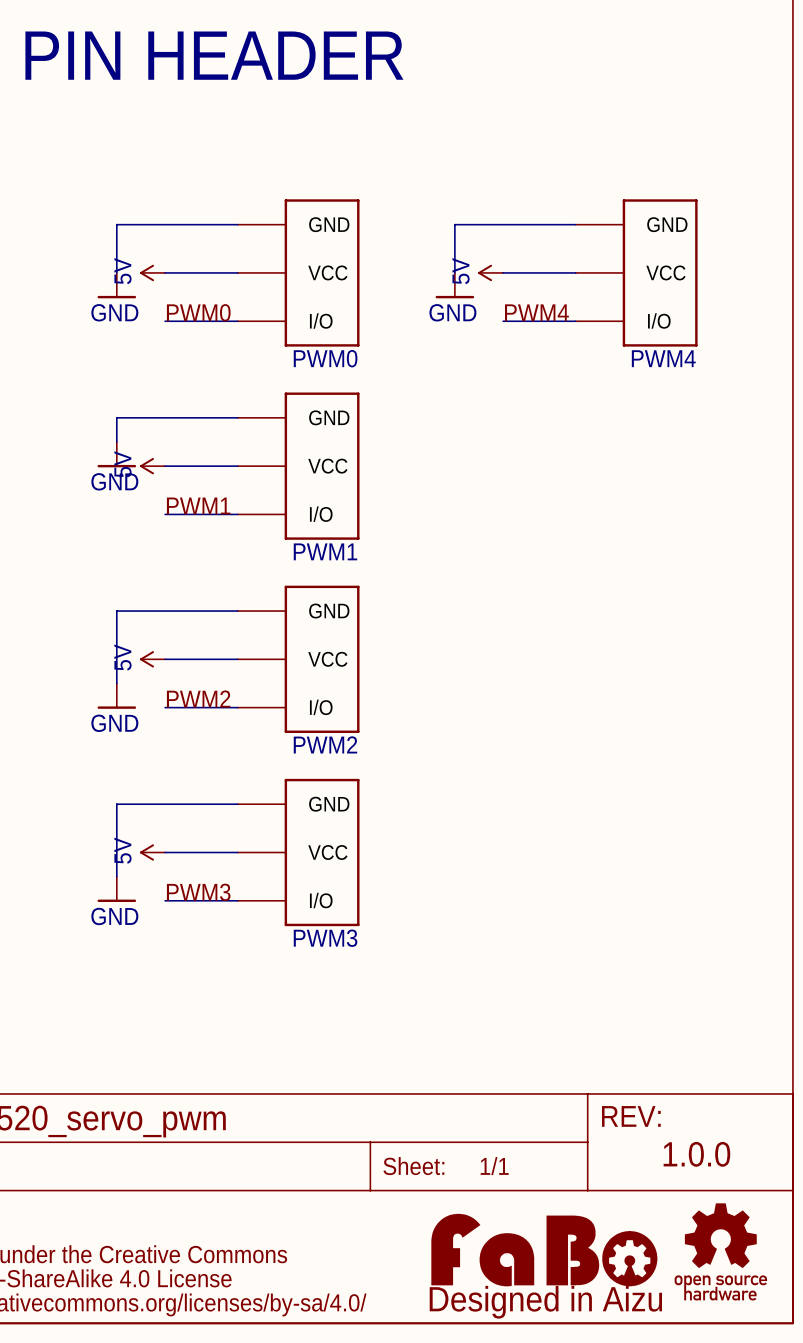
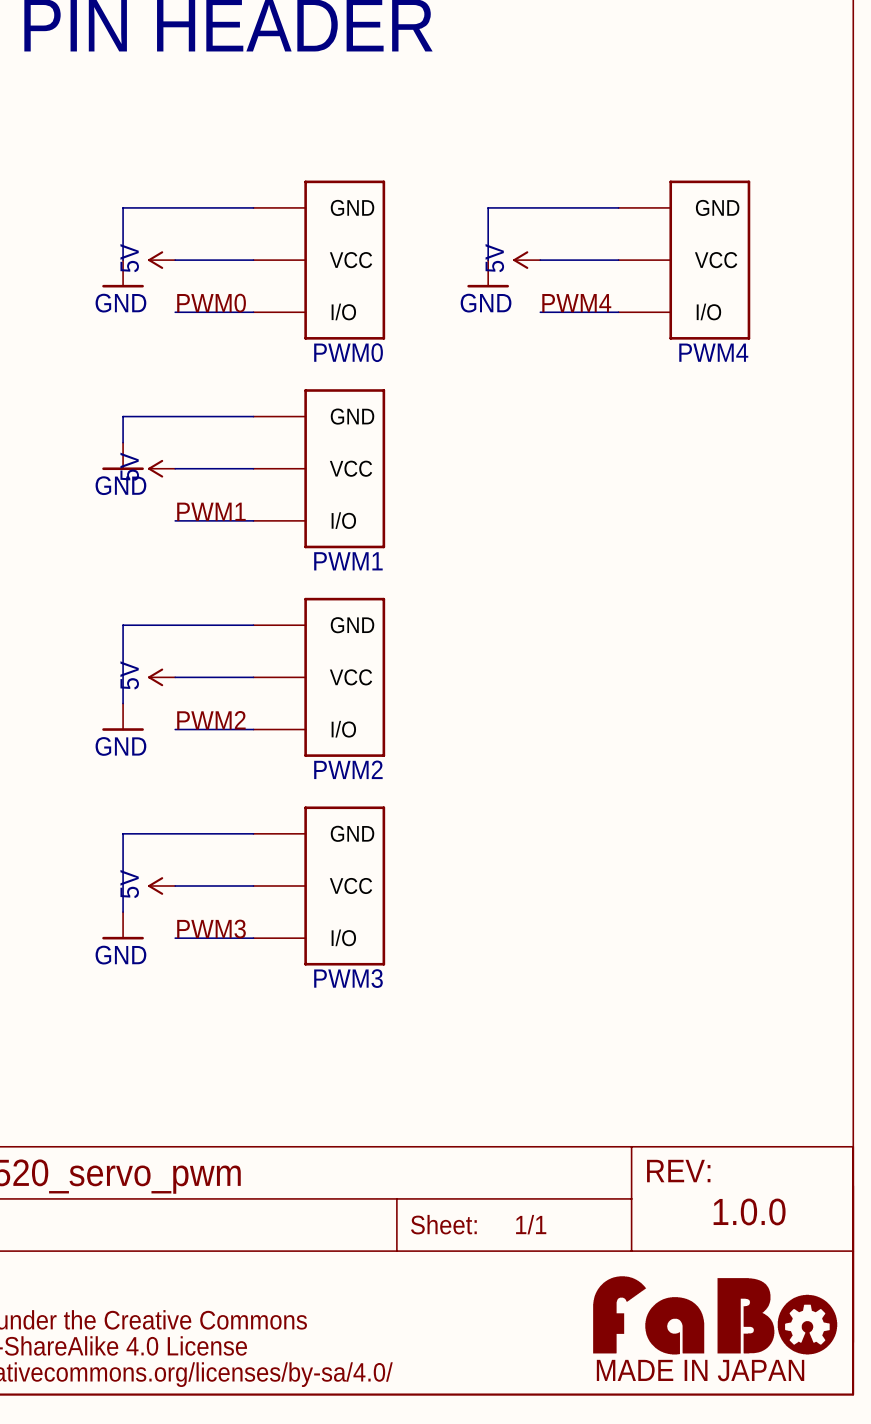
part: (544, 1250) -> none
part: none -> (715, 1315)
part: (720, 1251) -> none

